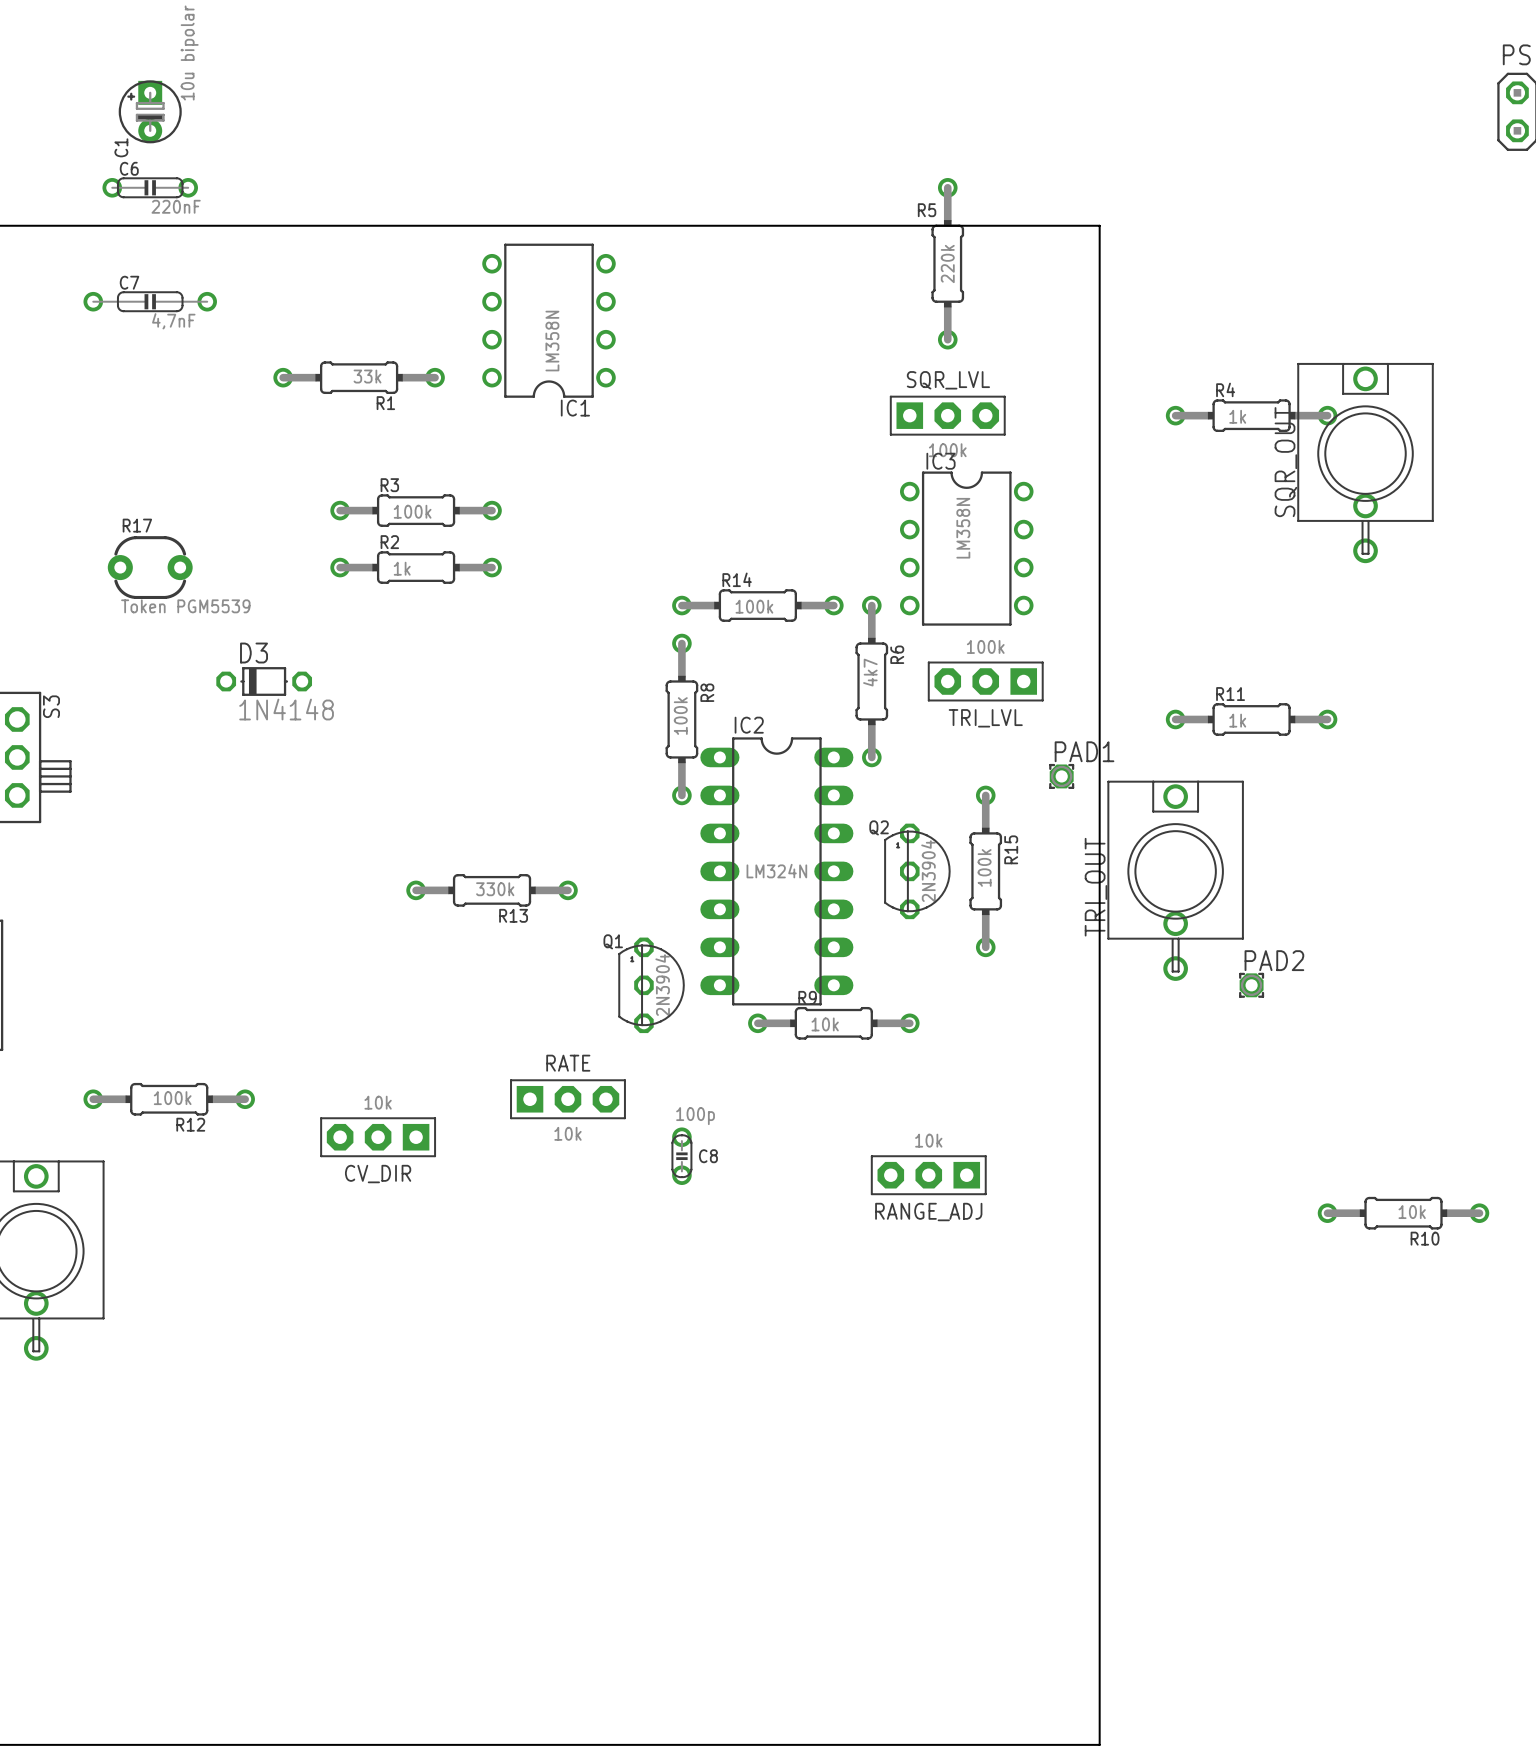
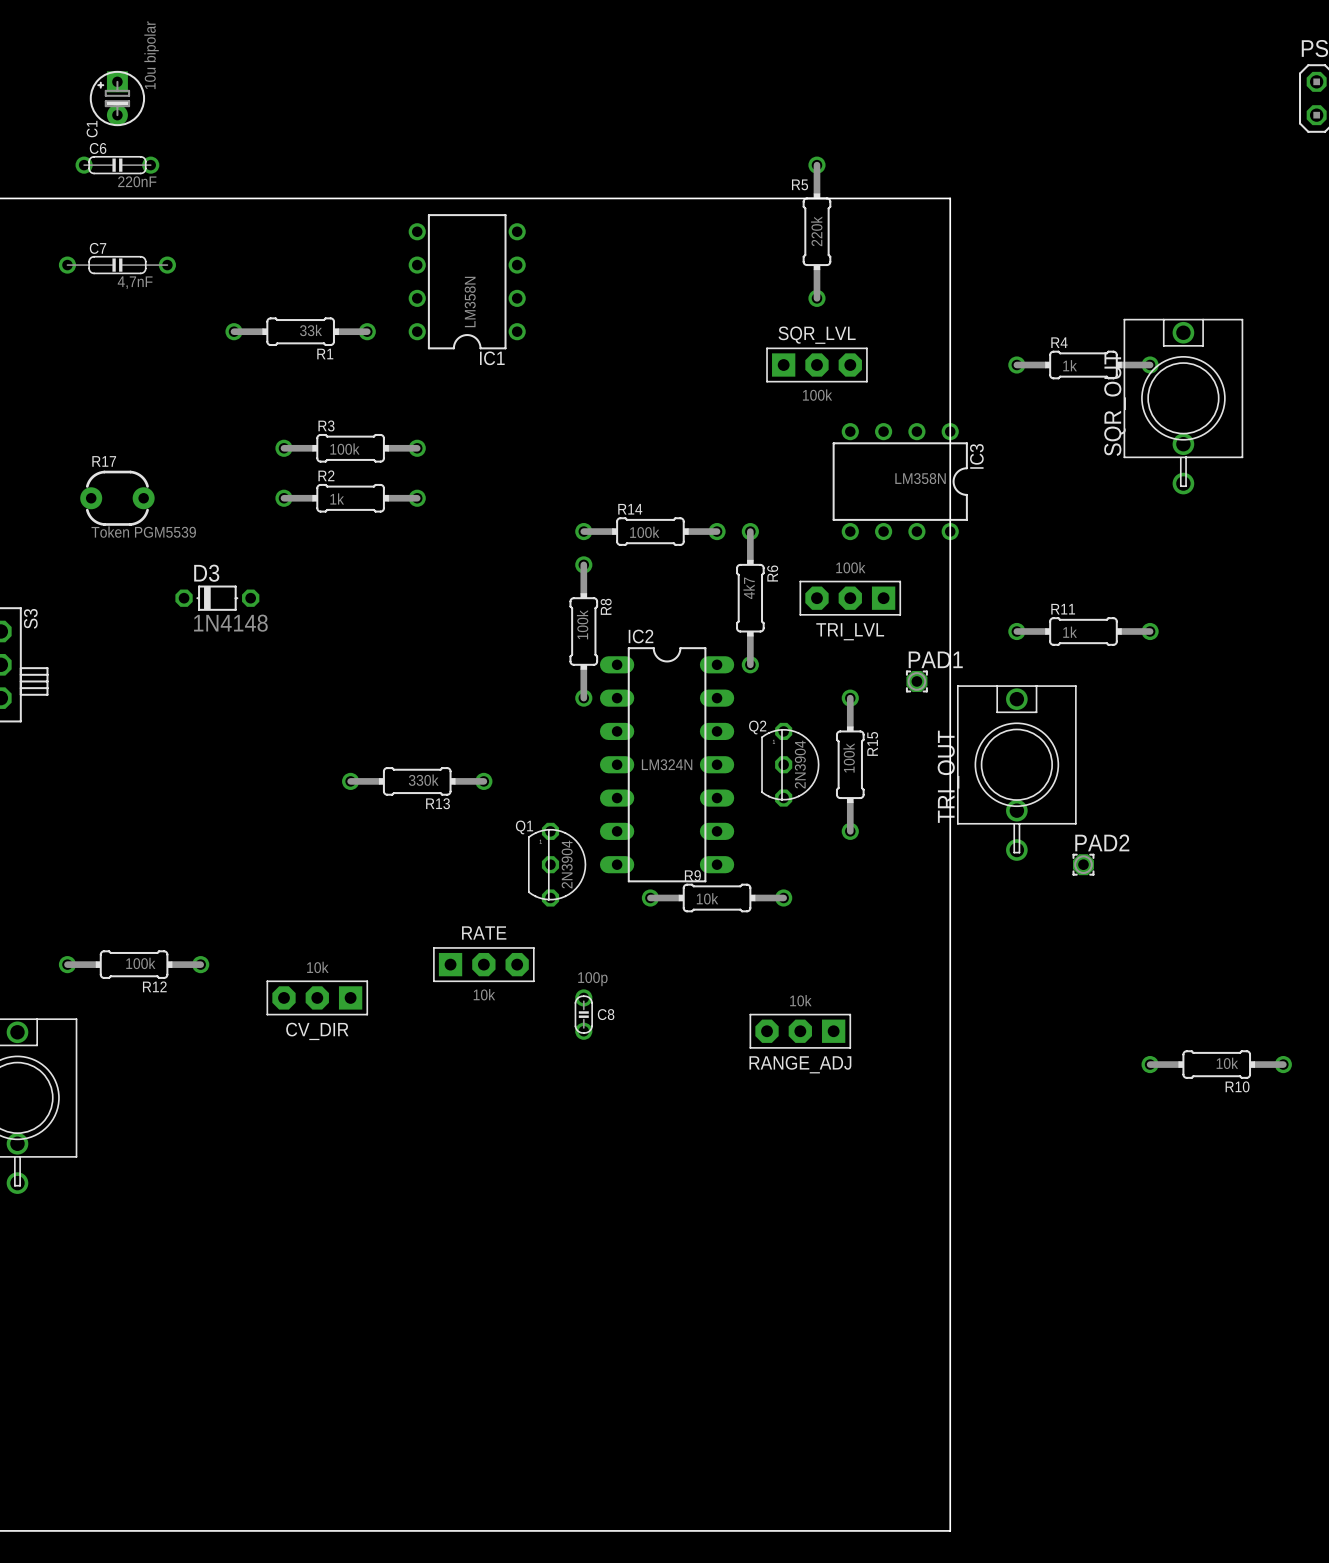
IC3 rotation: 0° (966, 548) -> 90° clockwise (900, 481)

